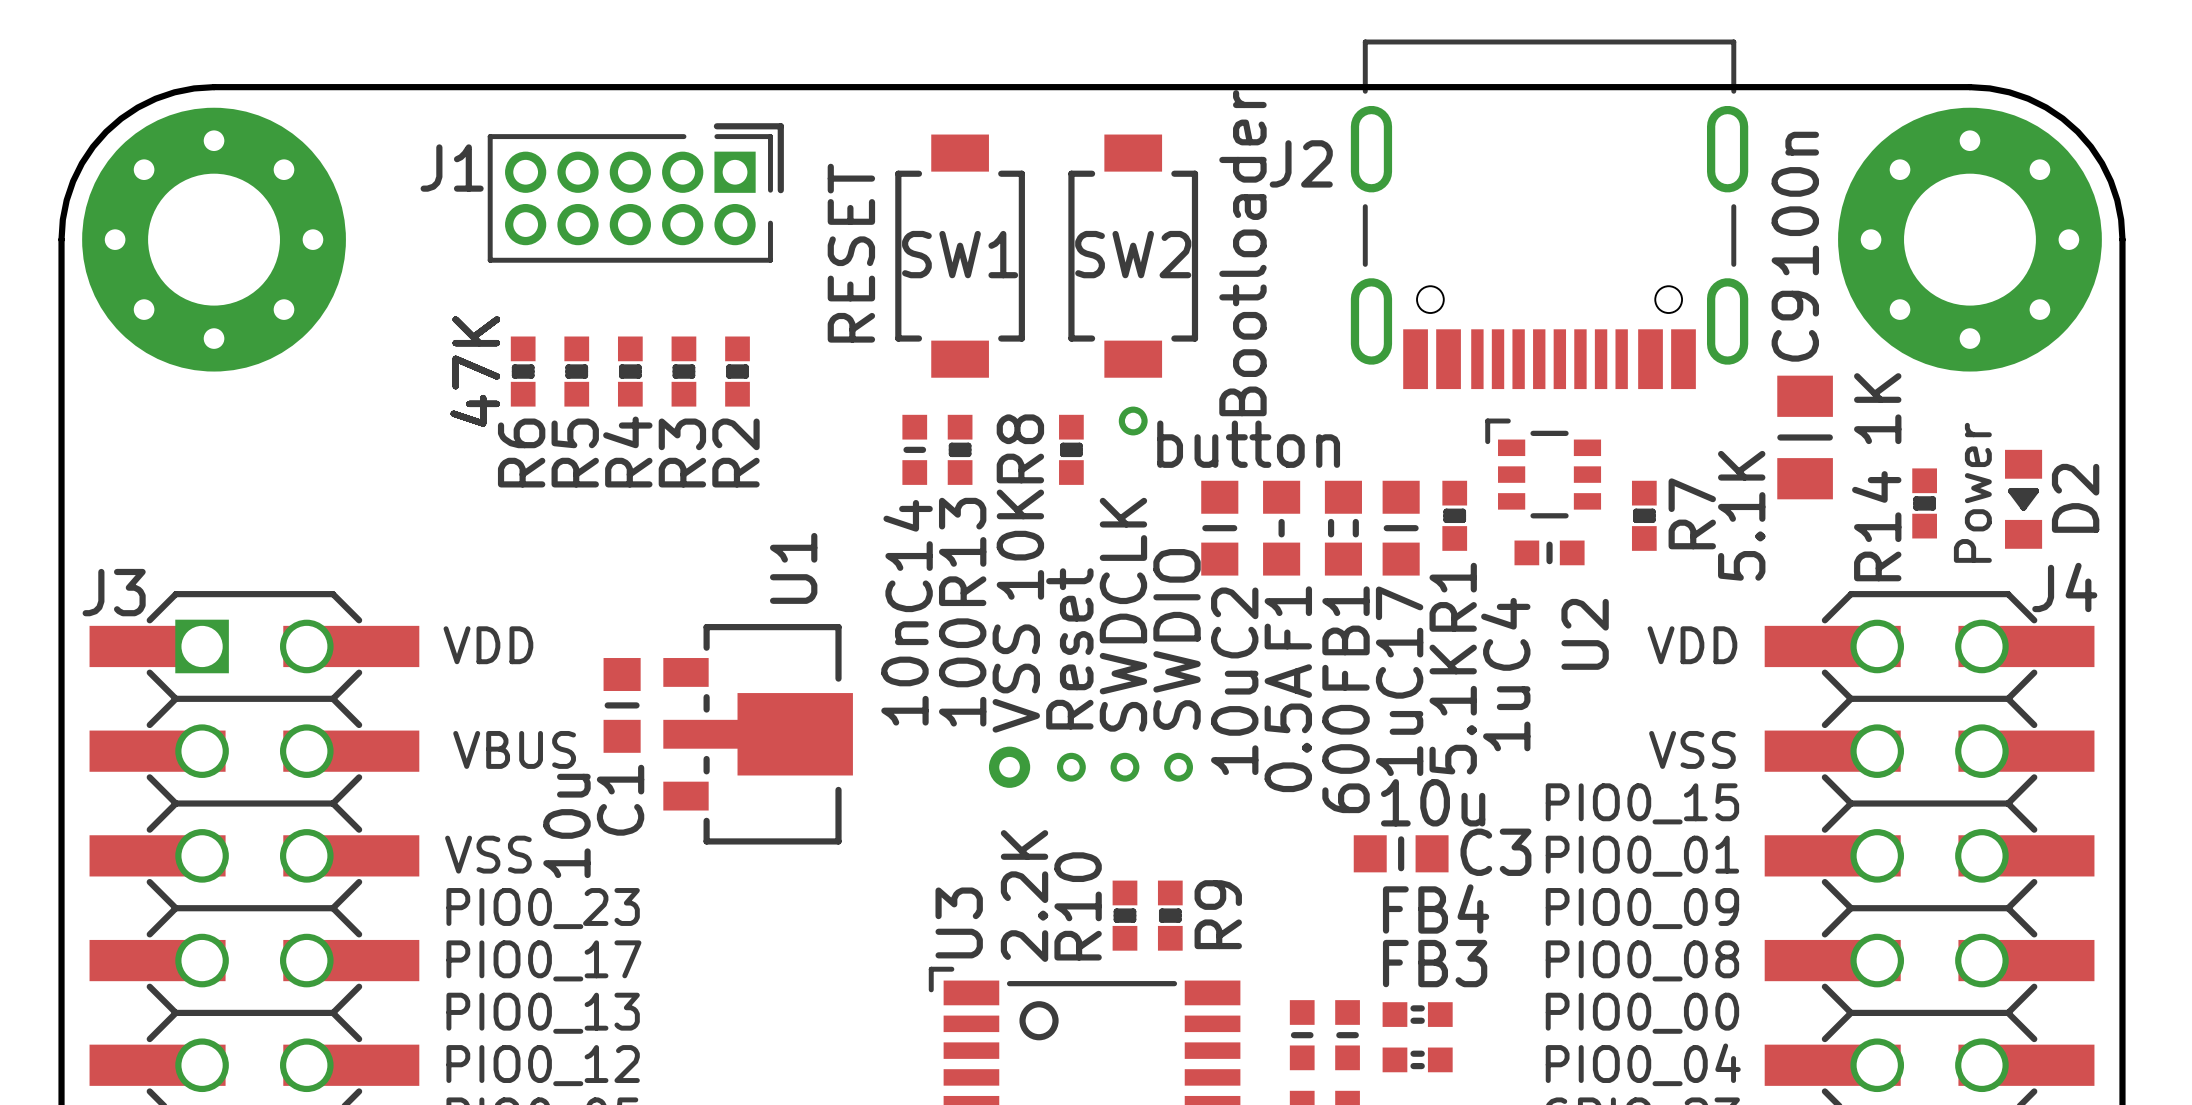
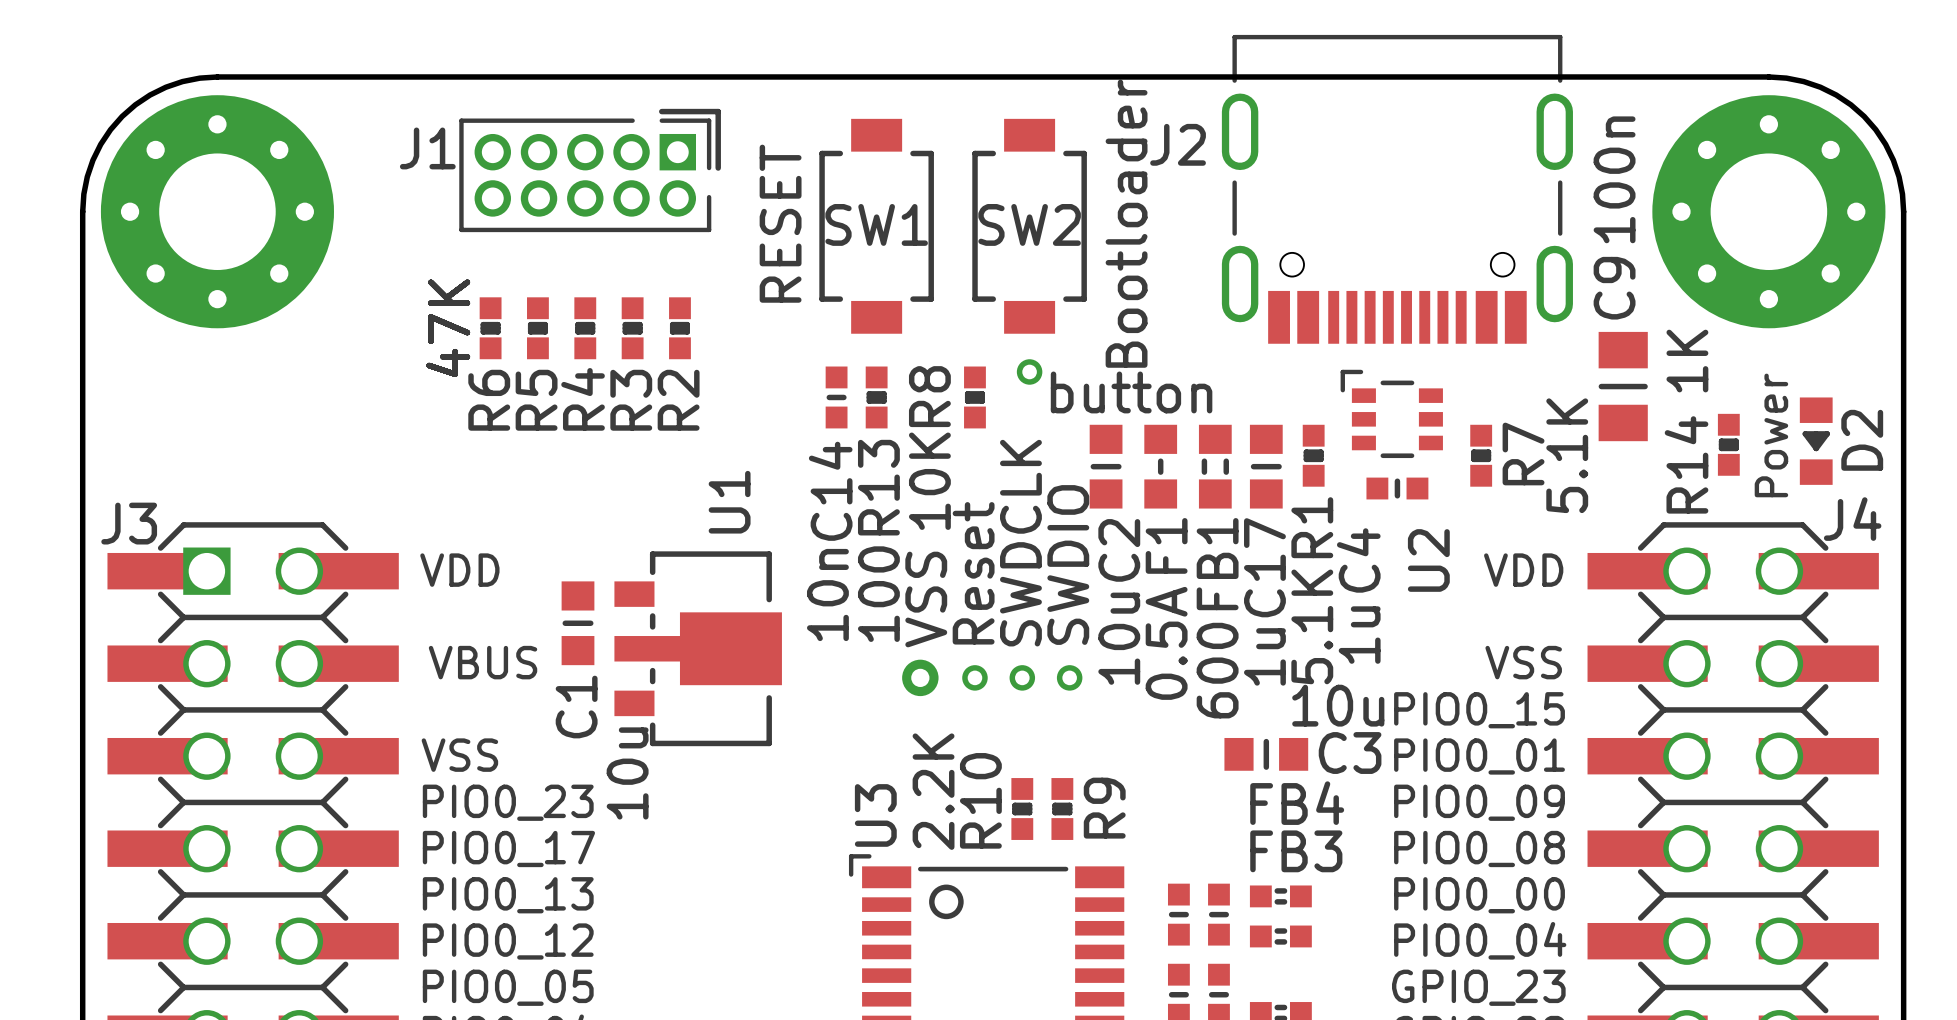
C3 value position: 10u (1433, 802) -> 10u (1338, 705)
C1 value position: 10u (566, 825) -> 10u (627, 773)

